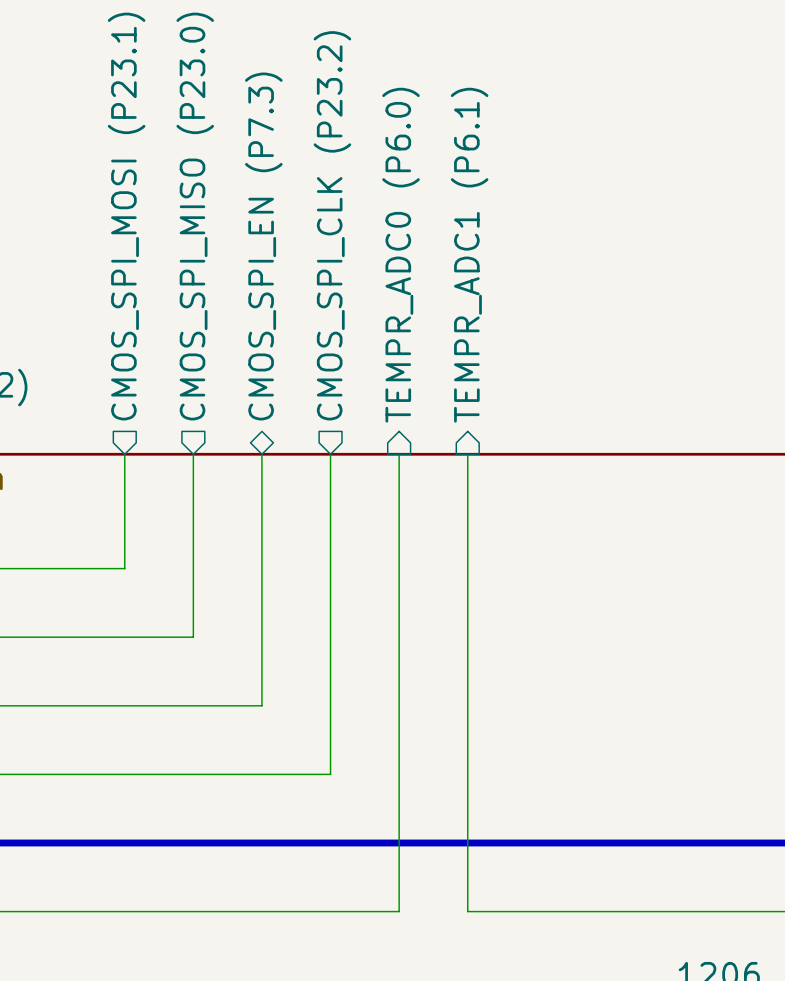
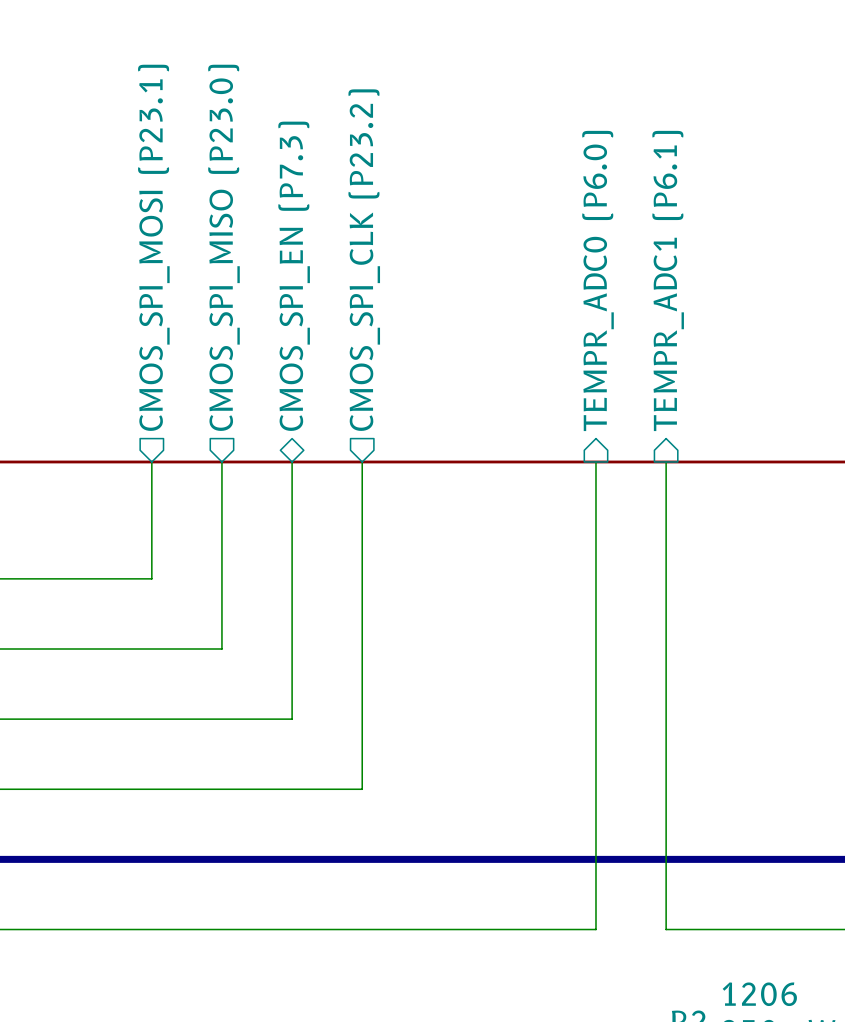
sheet pin position: TEMPR_ADC0 (P6.0) (401, 255) -> TEMPR_ADC0 (P6.0) (598, 280)
sheet pin position: TEMPR_ADC1 (P6.1) (469, 255) -> TEMPR_ADC1 (P6.1) (668, 280)
wire: (399, 454) (399, 911) -> (502, 929) (432, 929)
wire: (467, 454) (467, 911) -> (666, 461) (666, 929)
wire: (559, 911) (627, 911) -> (595, 929) (595, 461)

